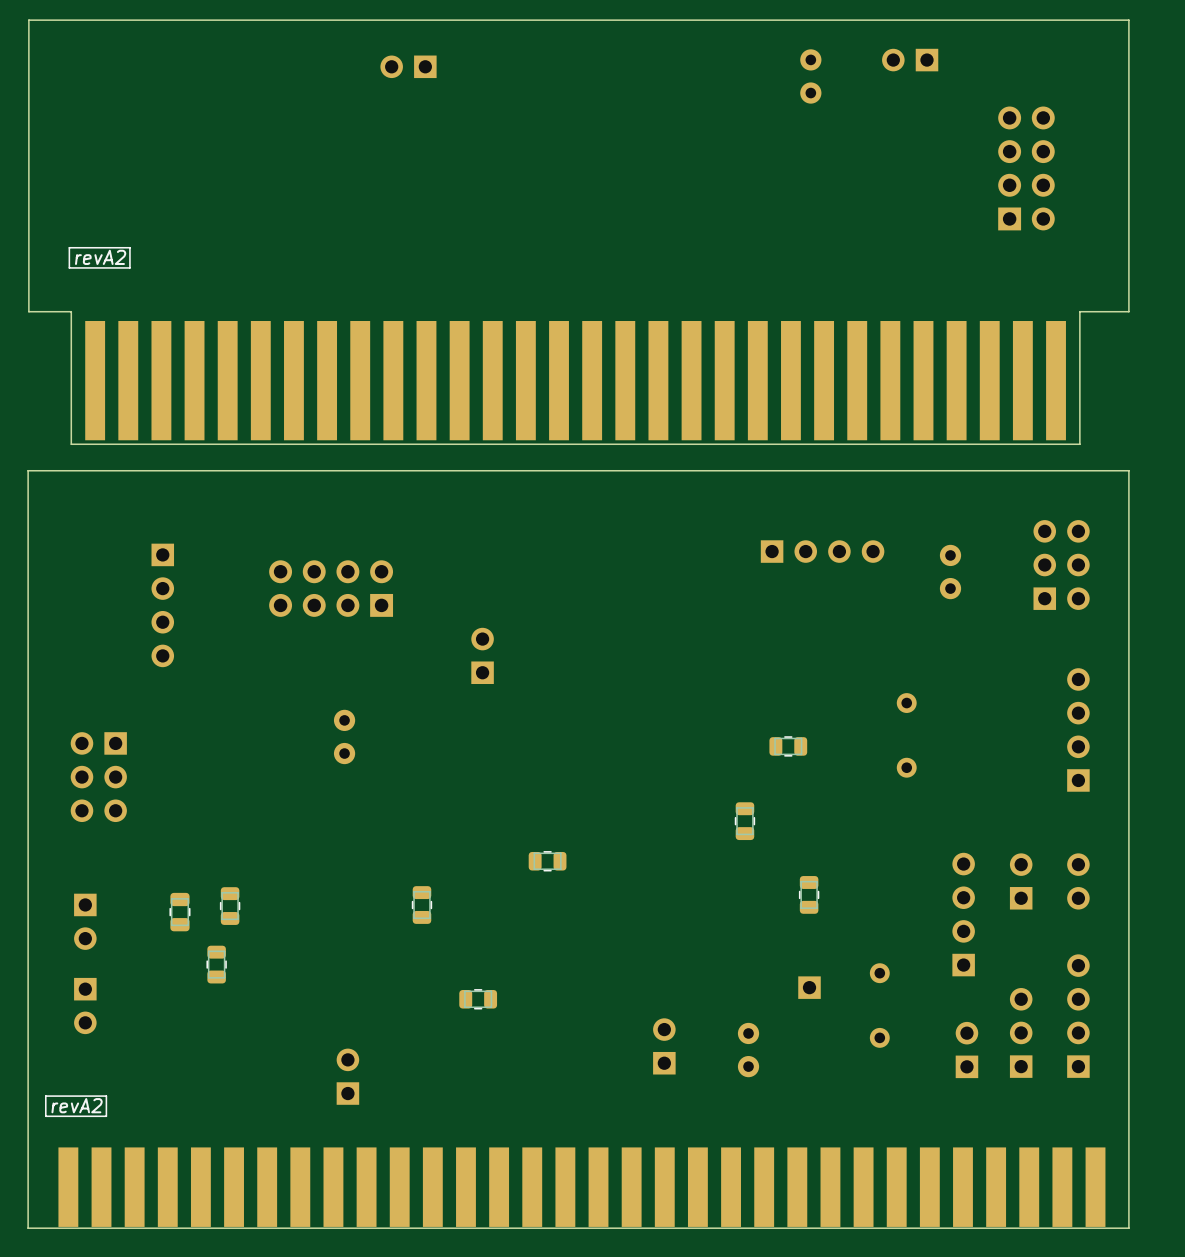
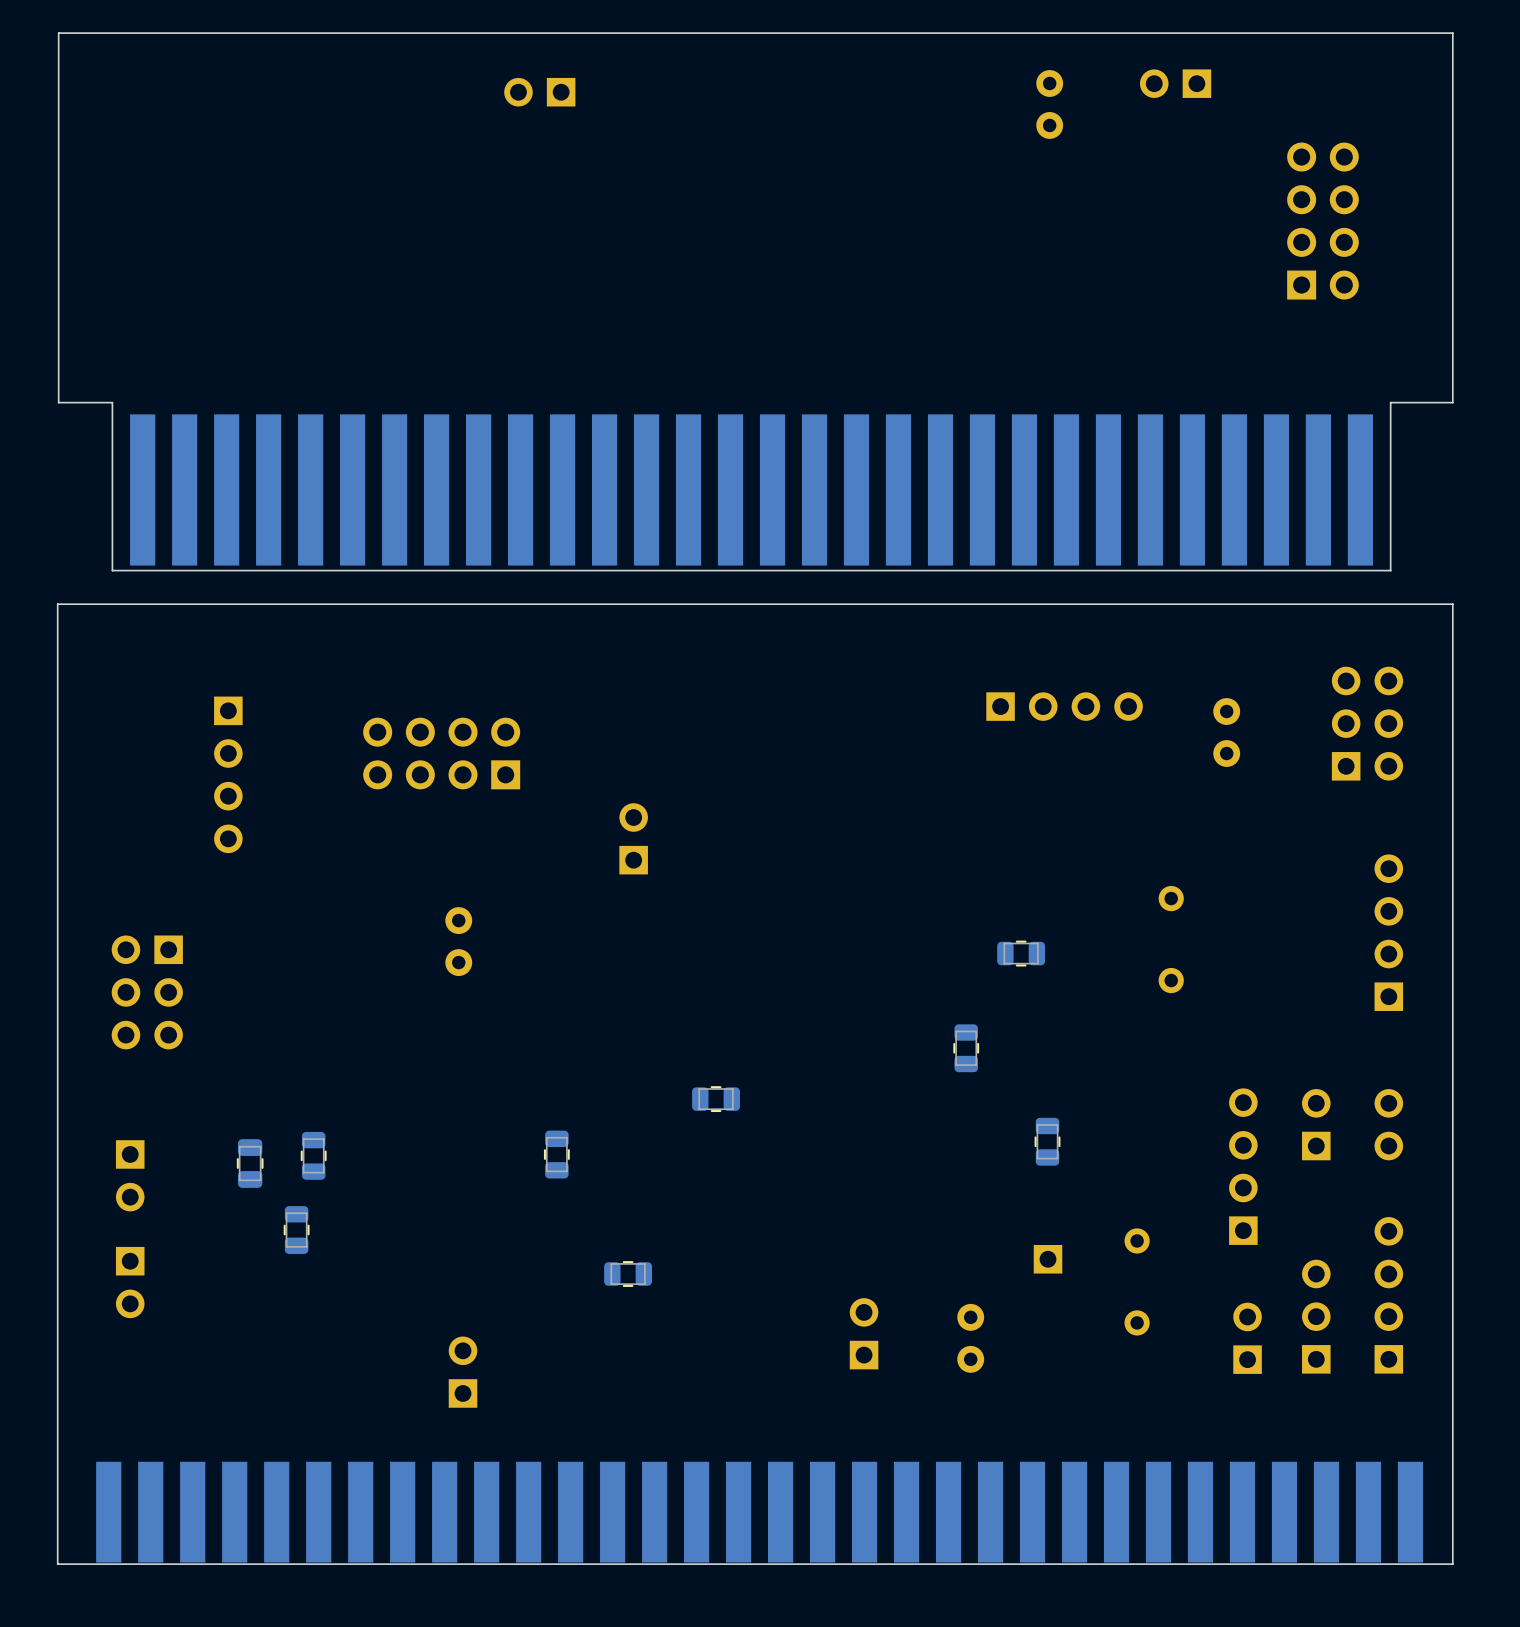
line: (129, 247) (69, 247) (69, 267) (129, 267) (129, 247) -> none
text: revA2 (100, 257) -> none
line: (106, 1096) (45, 1096) (45, 1116) (106, 1116) (106, 1096) -> none
text: revA2 (77, 1105) -> none

